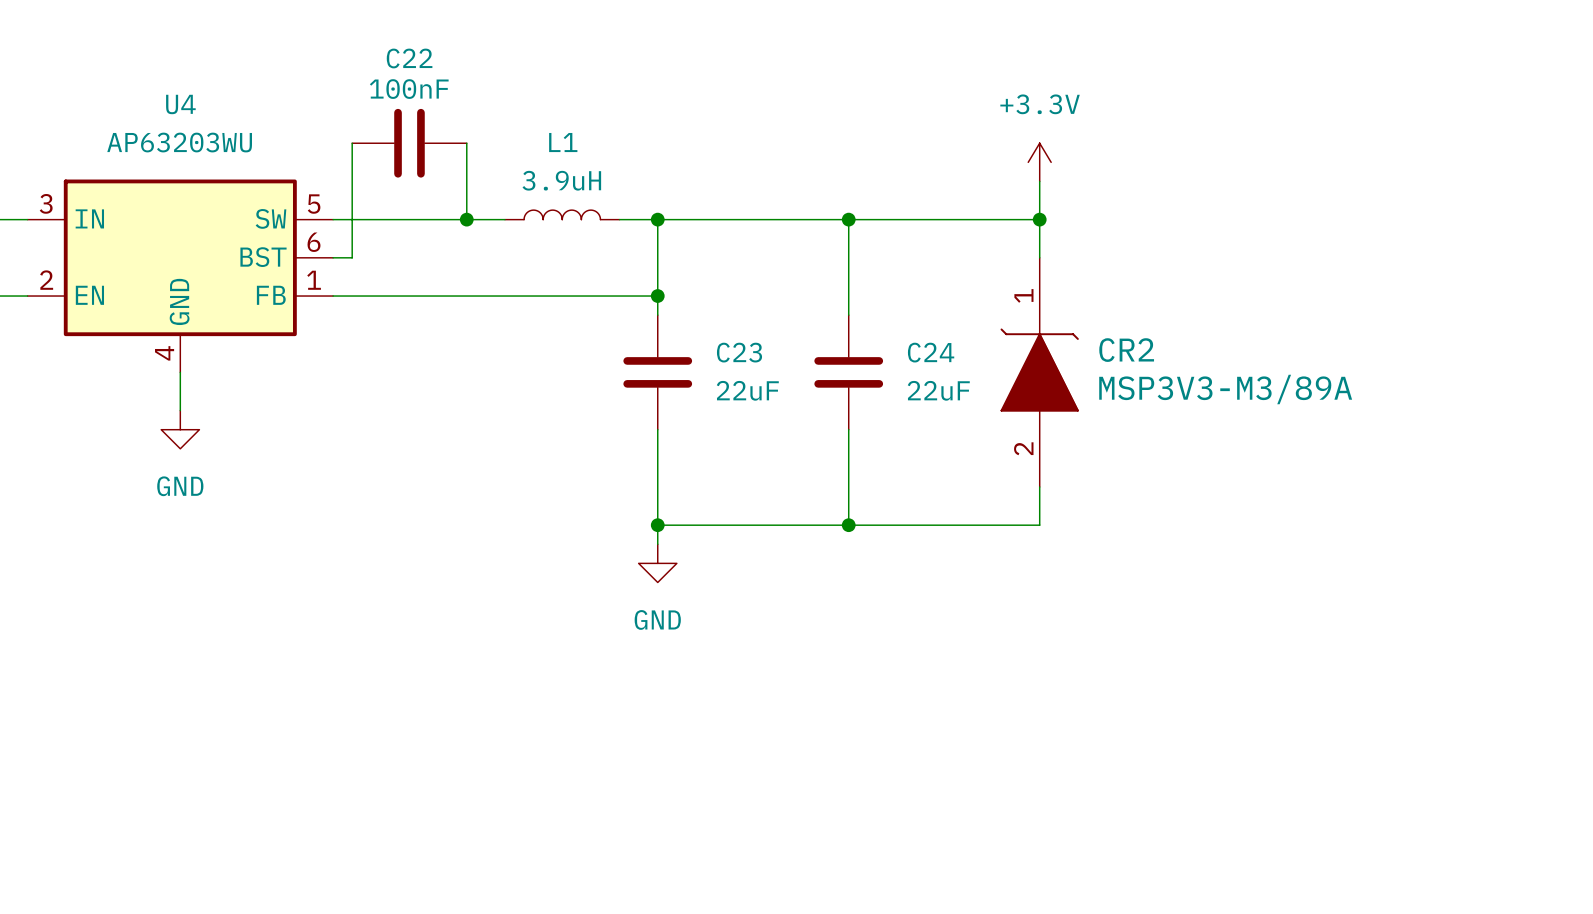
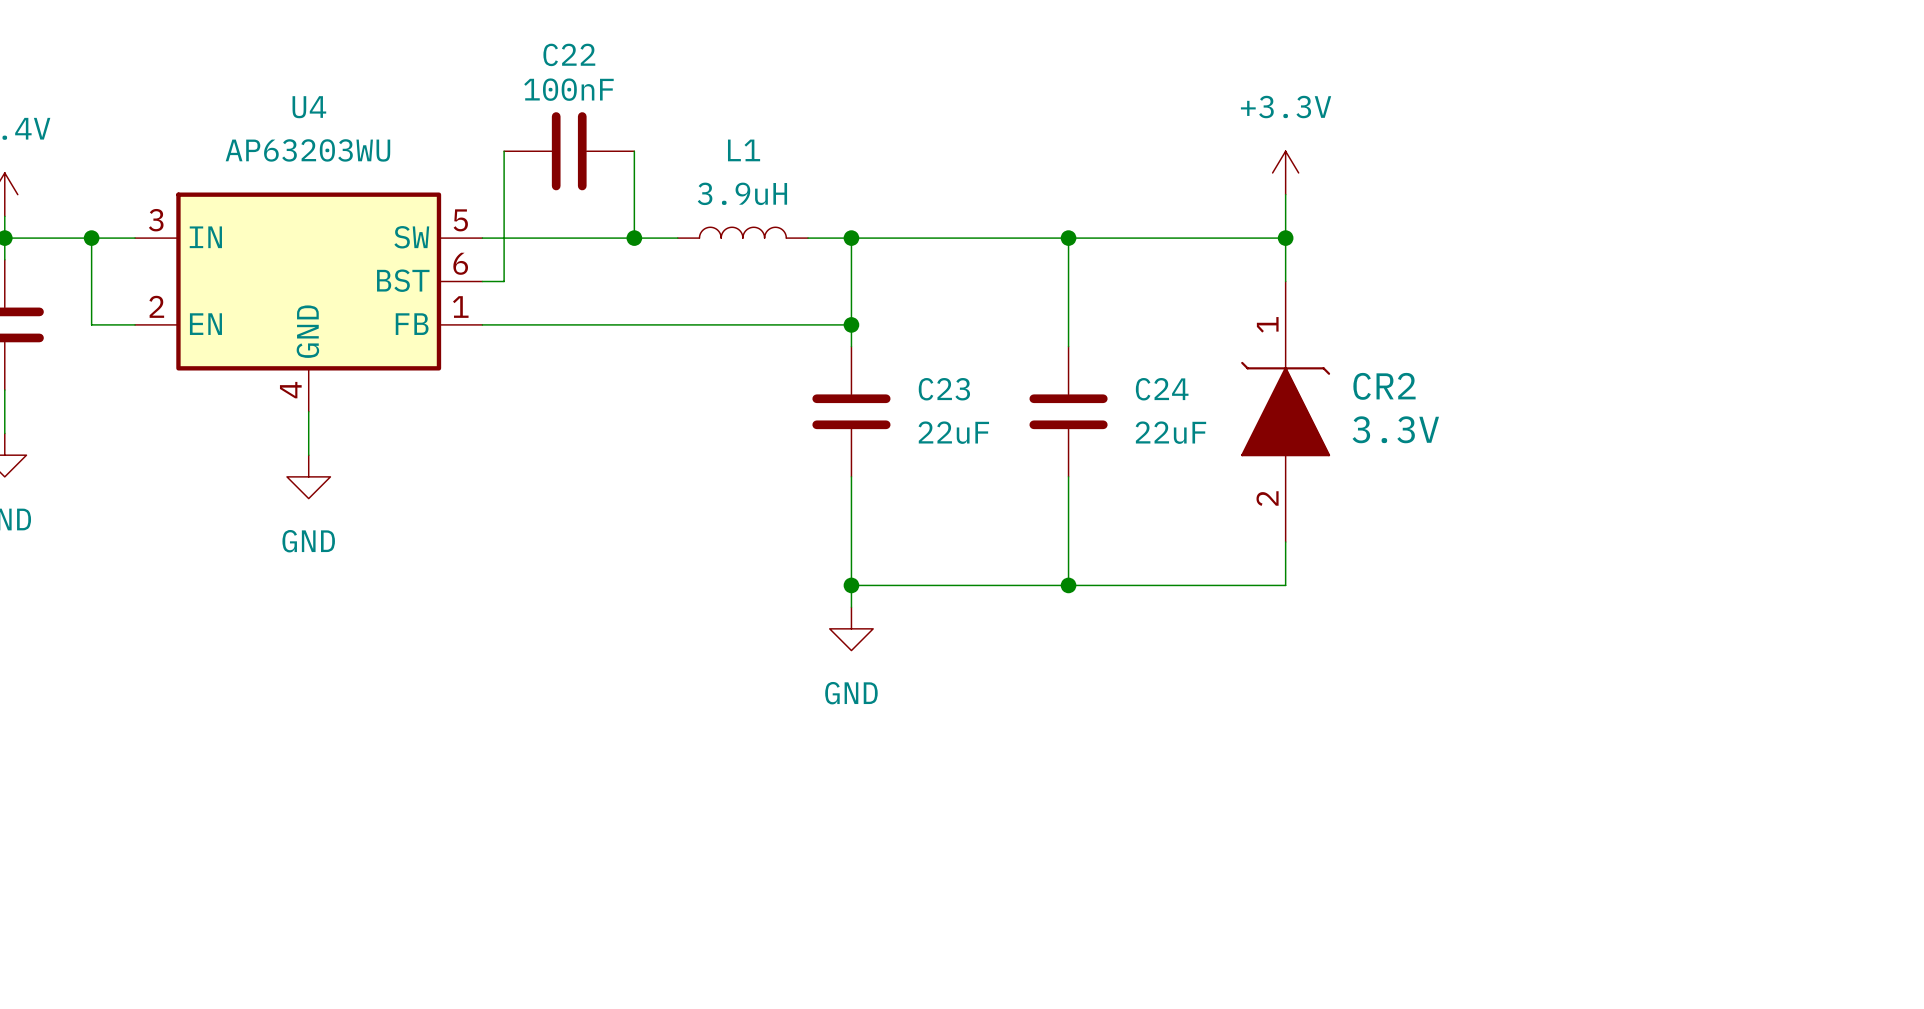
CR2 value: MSP3V3-M3/89A (1225, 389) -> 3.3V (1395, 429)

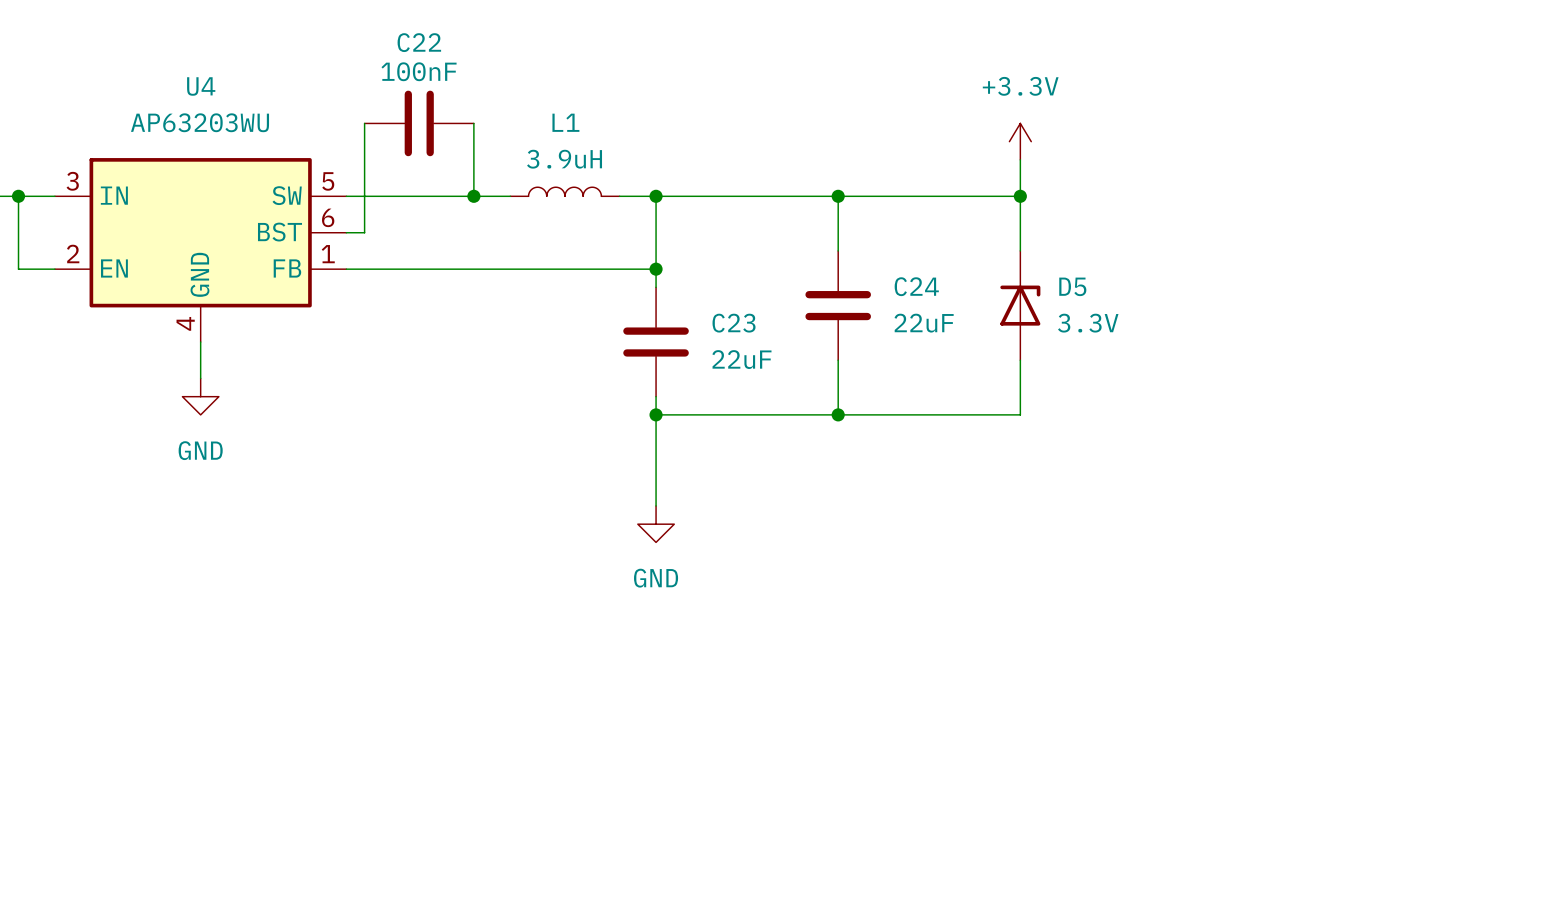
D5: none -> 3.3V (1020, 305)
C24 position: (1068, 411) -> (838, 305)
CR2: 3.3V (1285, 411) -> none
wire: none -> (1020, 360) (1020, 414) (656, 414)
wire: (1068, 498) (1068, 585) -> none
wire: (1285, 542) (1285, 585) (851, 585) -> none
junction position: (851, 585) -> (656, 414)
junction position: (1068, 585) -> (838, 414)

